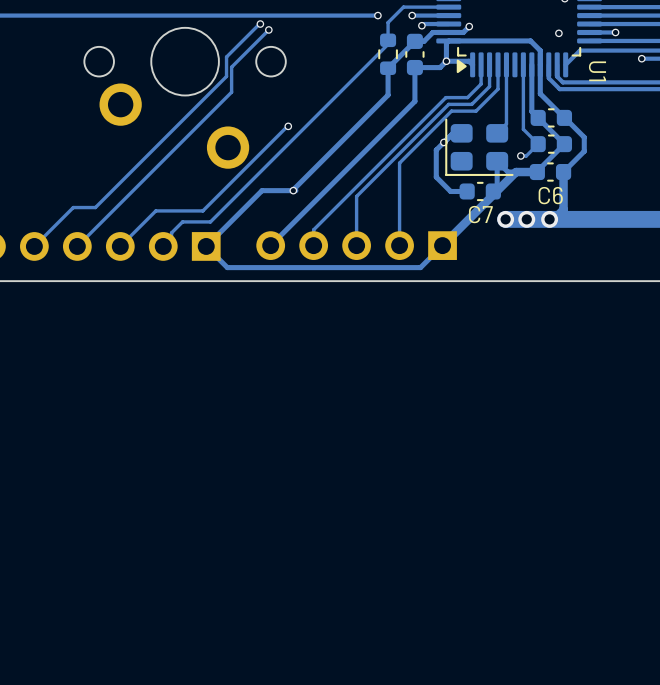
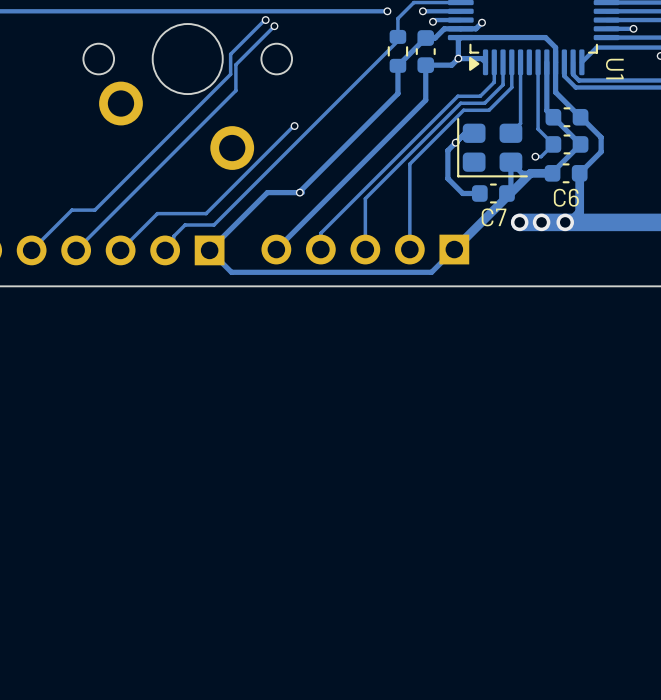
via: (558, 33) -> none

